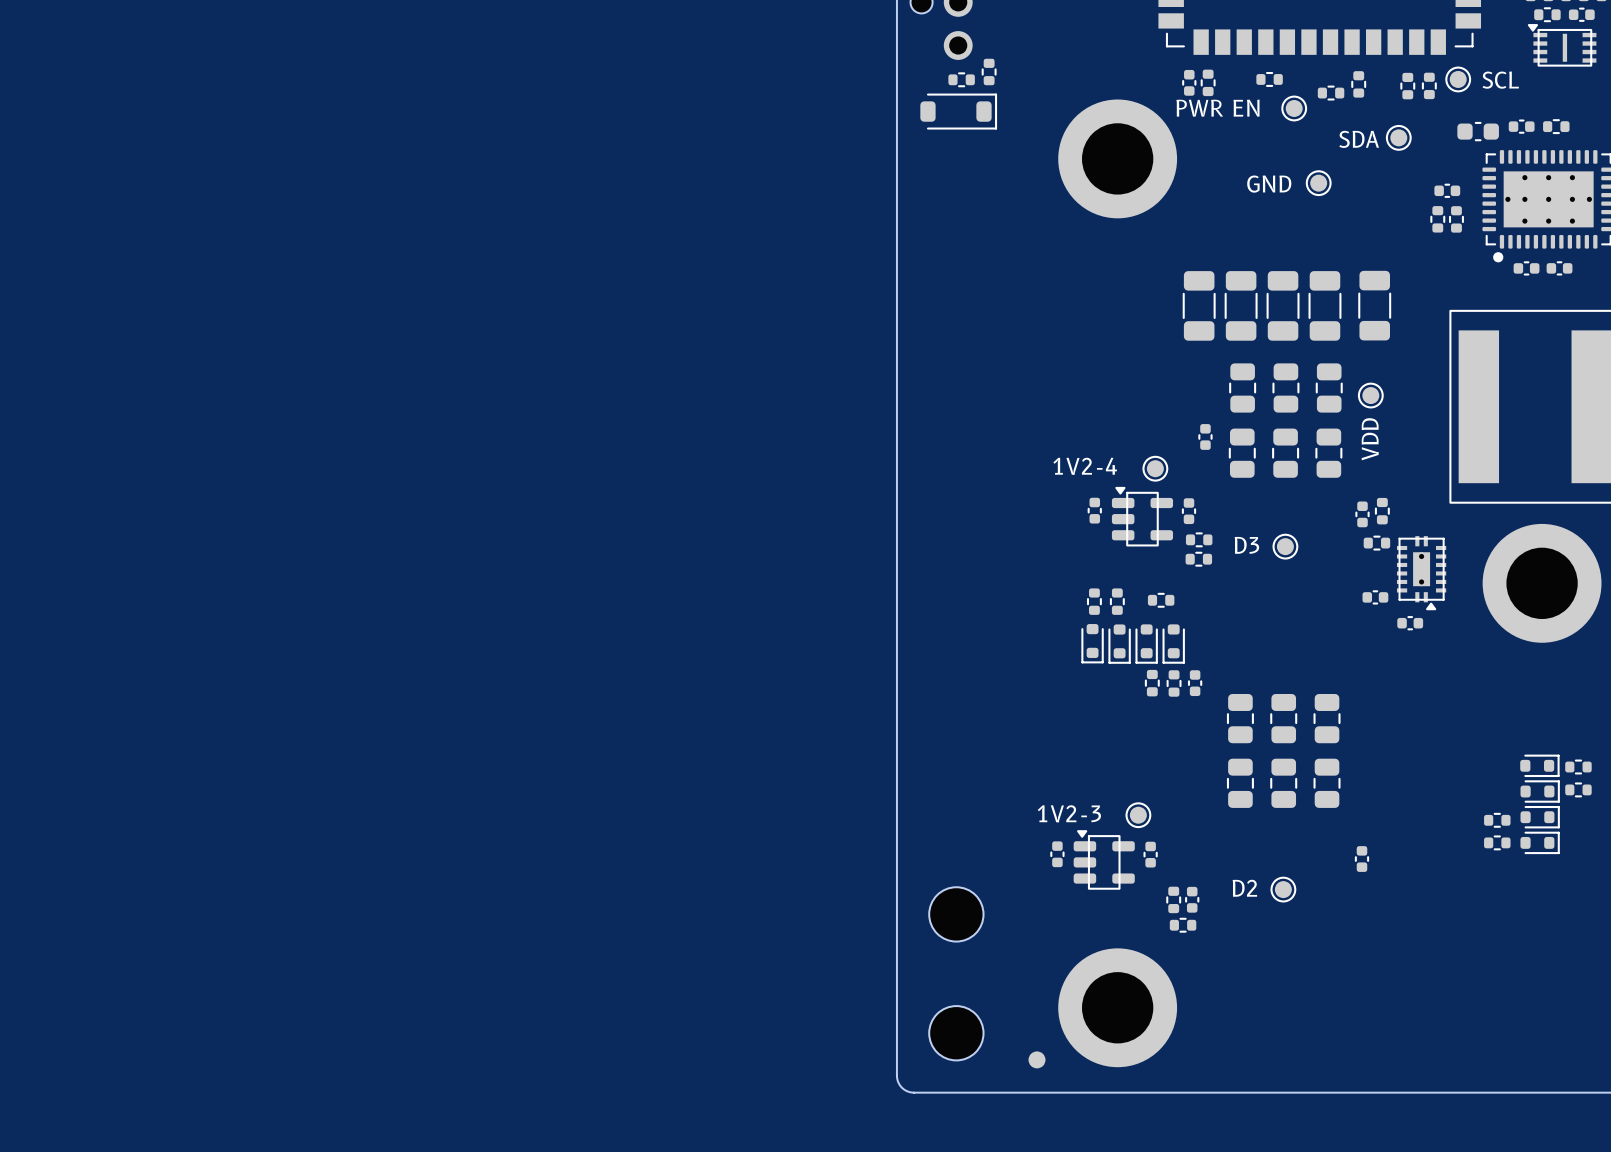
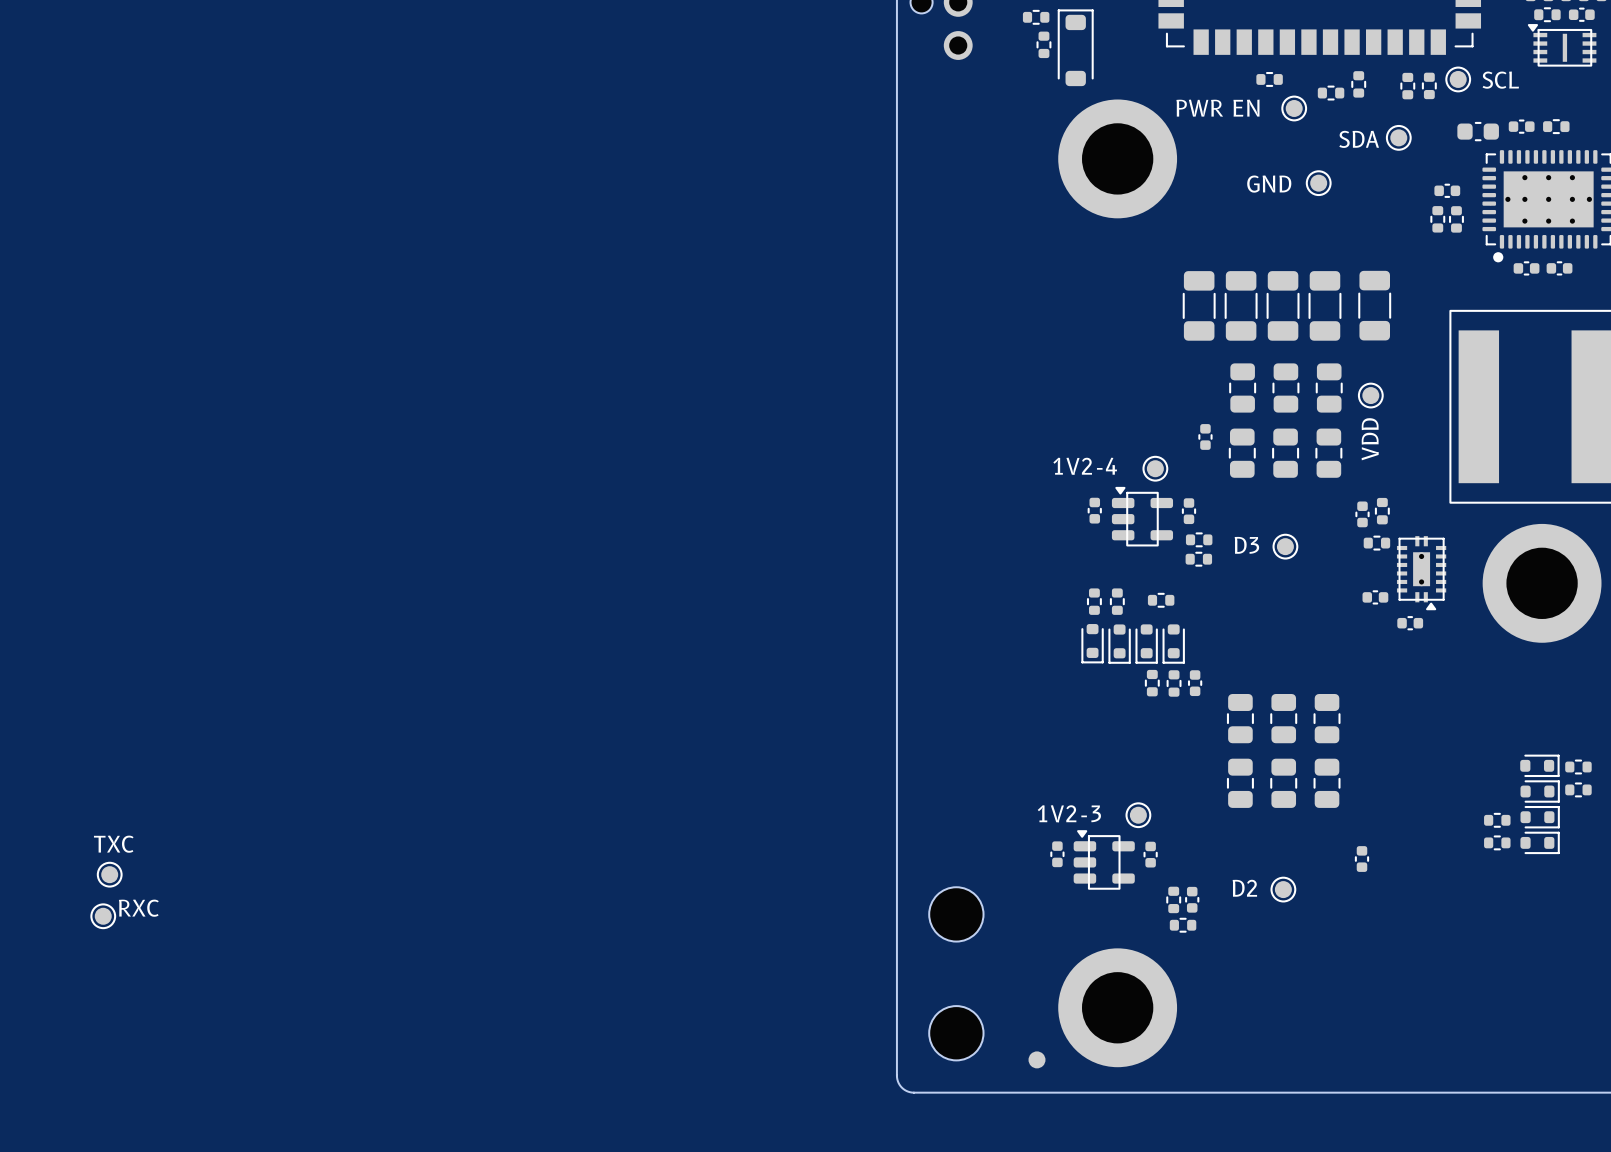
part: none -> (1036, 17)
part: none -> (1043, 44)
part: (989, 71) -> none
part: (961, 79) -> none
part: (1189, 82) -> none
part: (1208, 82) -> none
part rotation: 0° (958, 111) -> 90° counterclockwise (1075, 47)
part position: (958, 111) -> (1075, 47)
part: none -> TXC (109, 874)
part: none -> RXC (103, 916)

